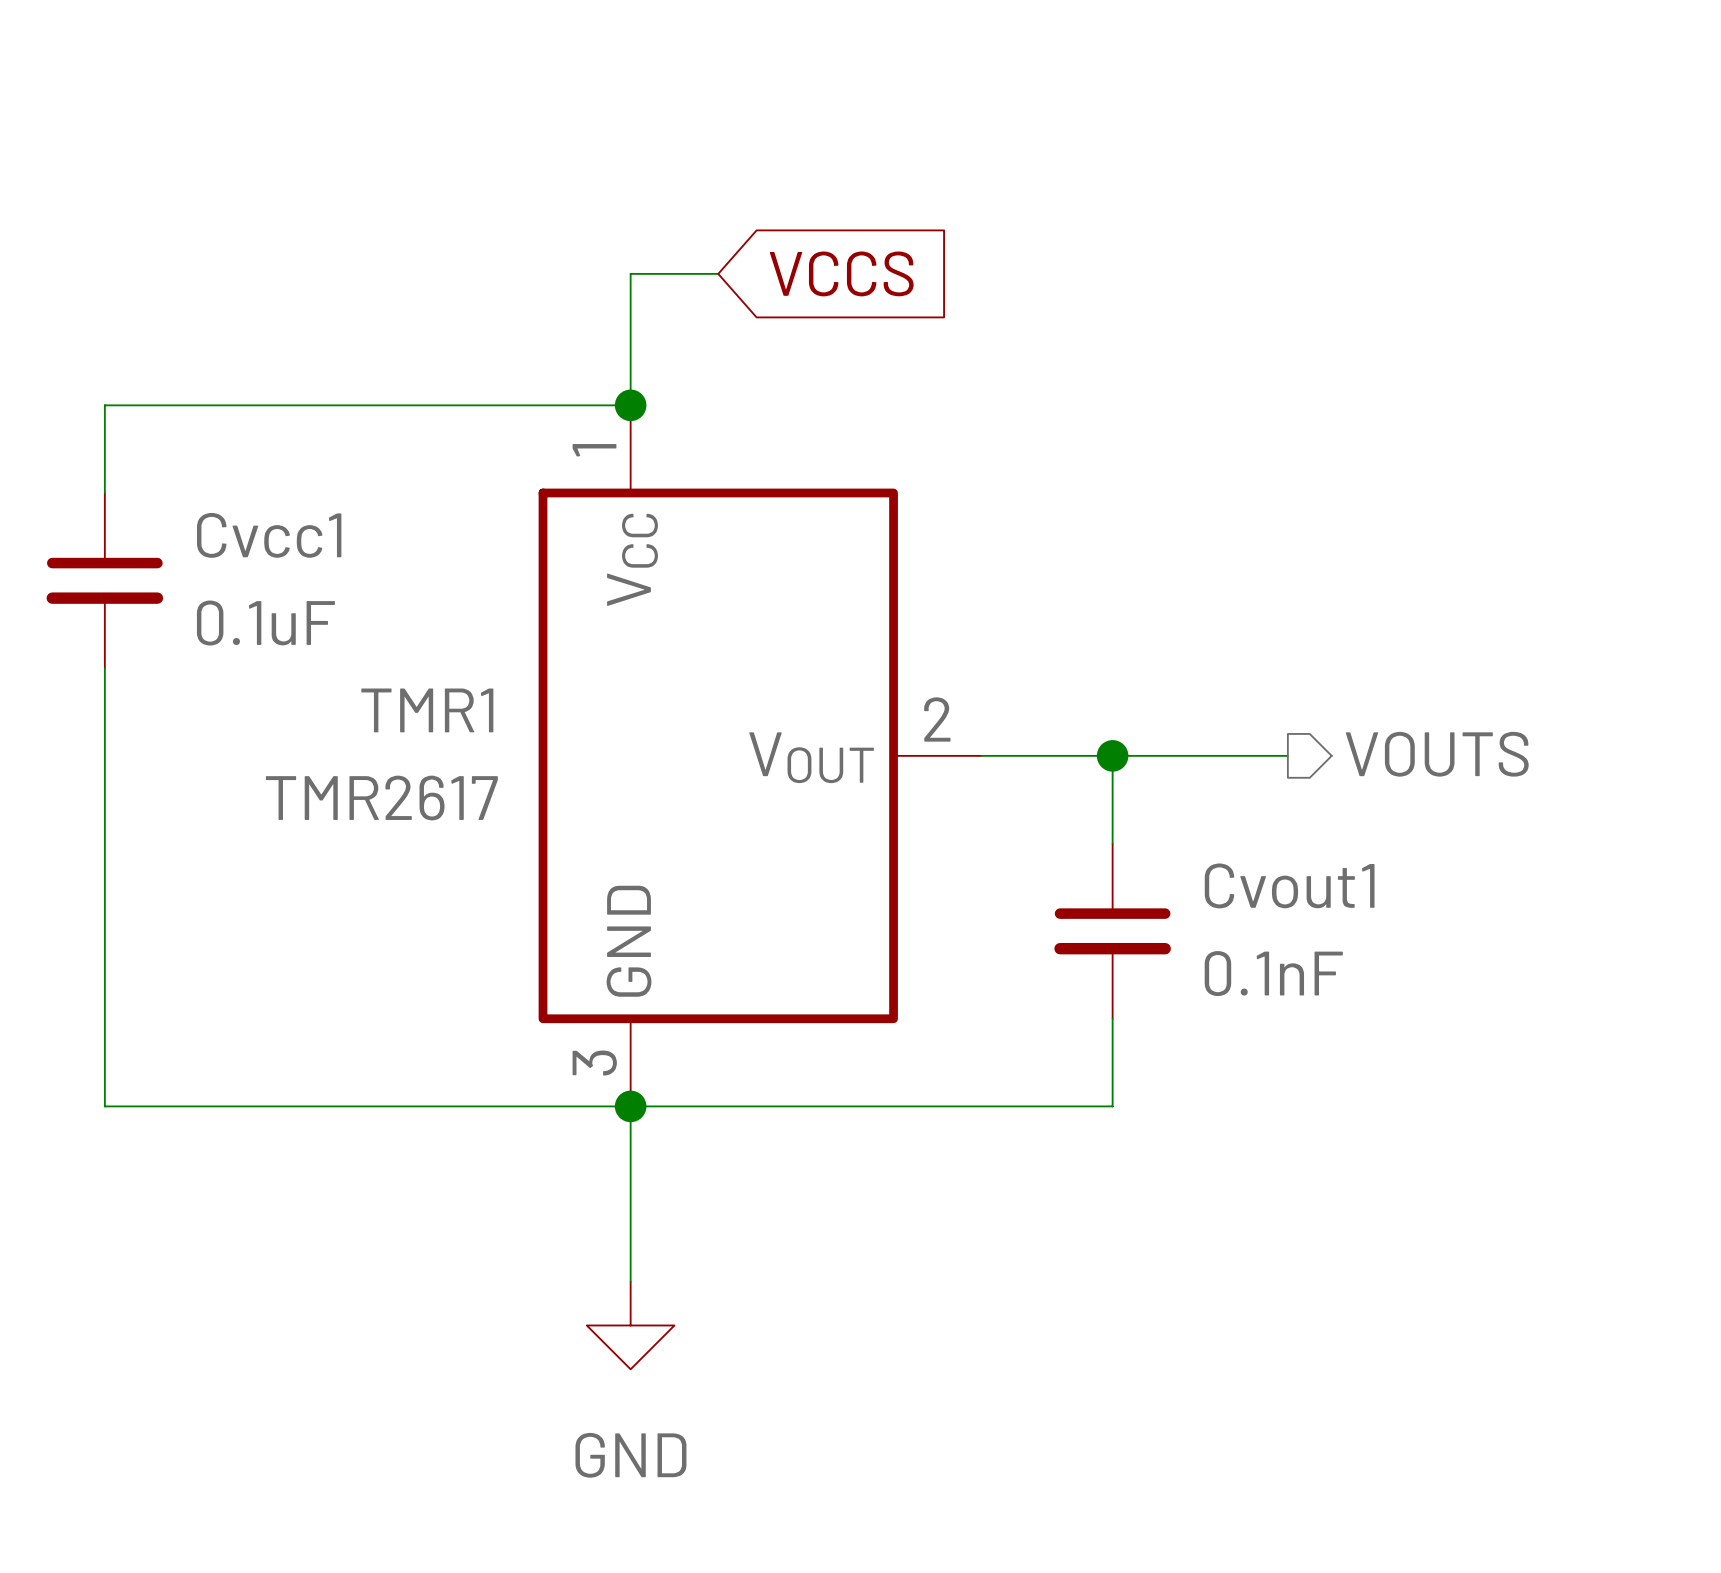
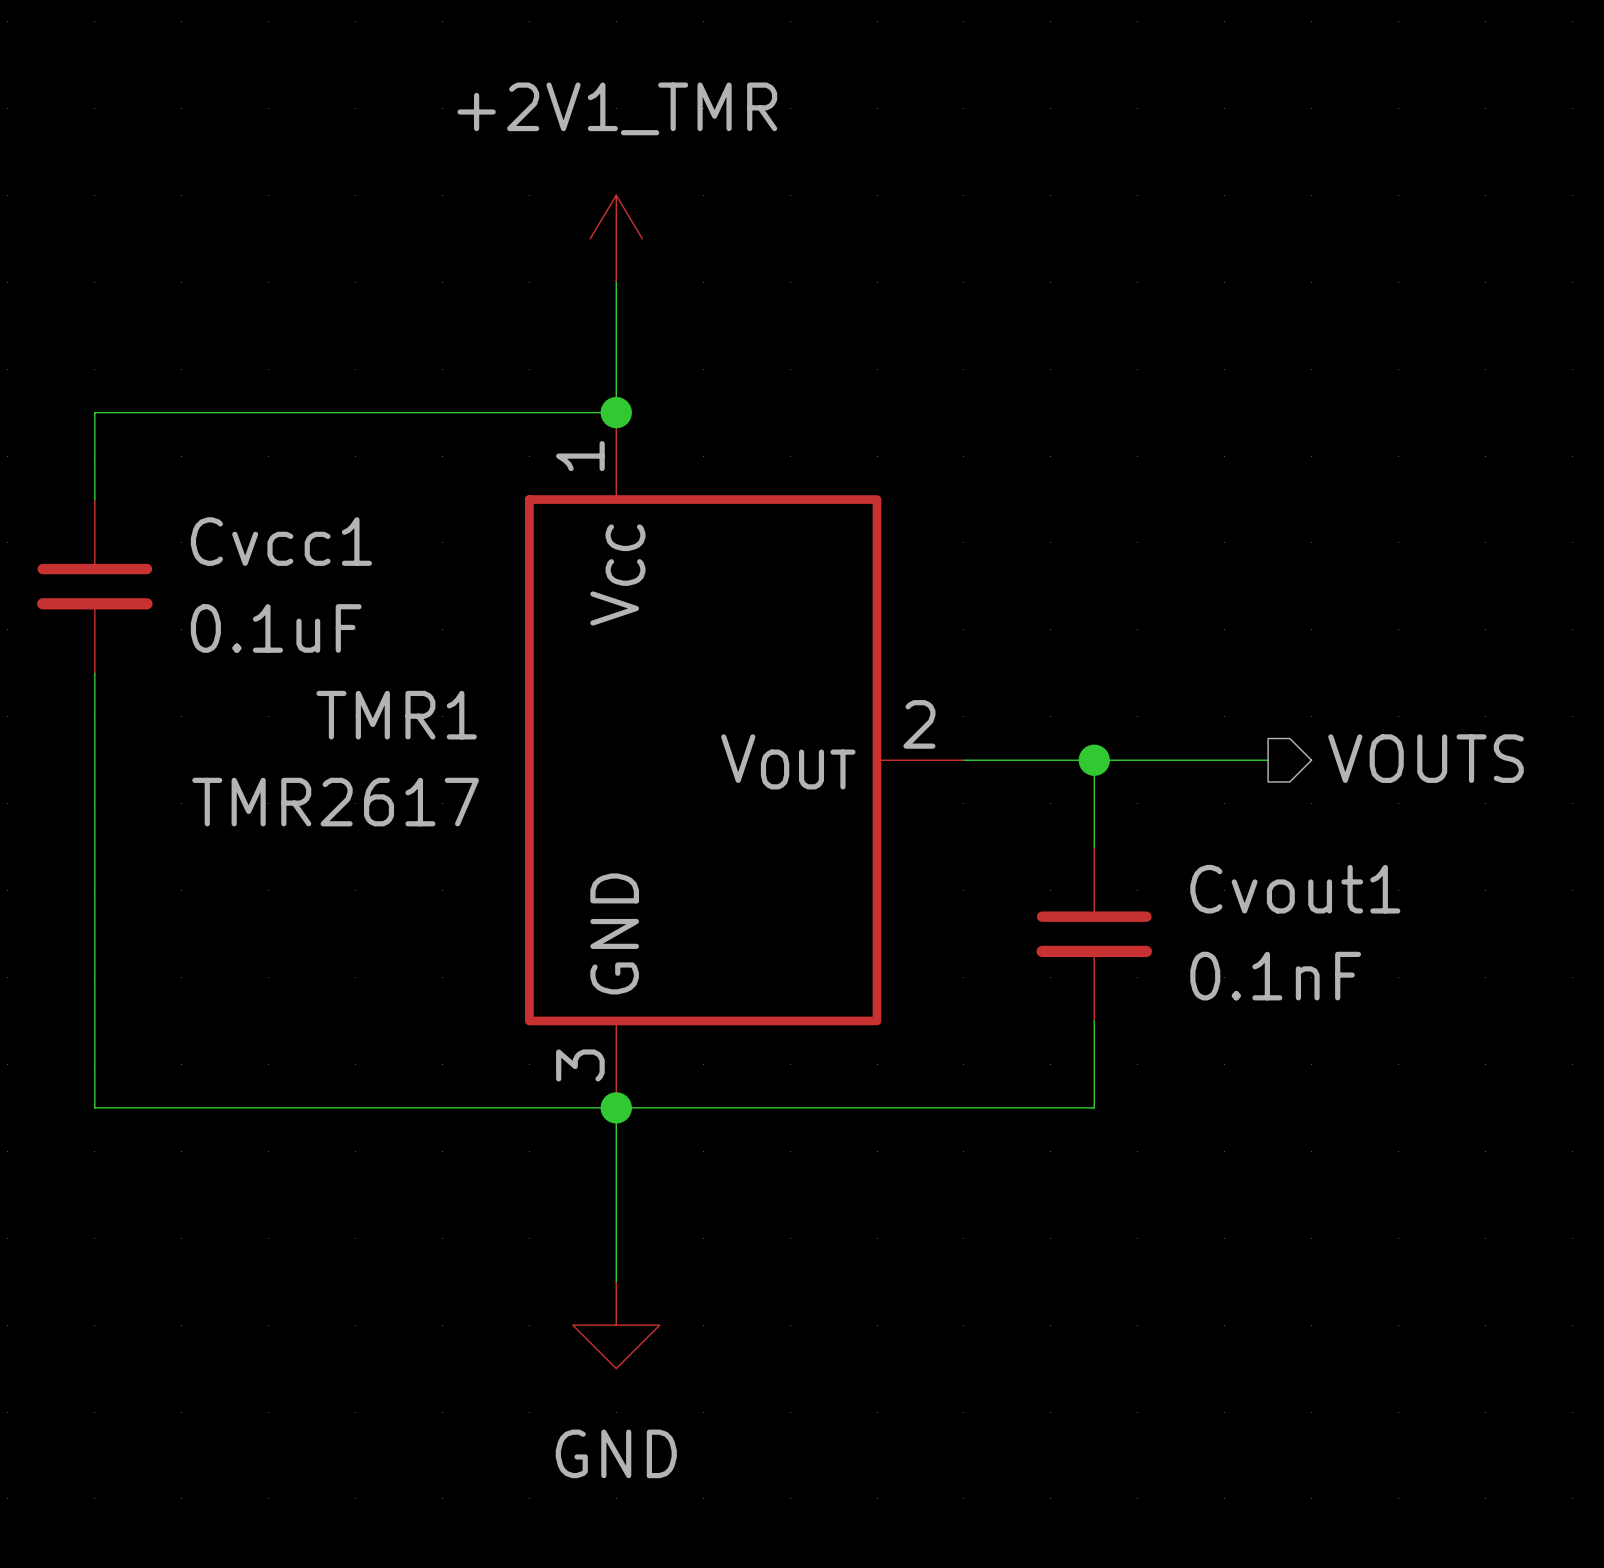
power symbol: none -> +2V1_TMR (616, 238)
wire: (630, 273) (718, 273) -> none
global label: VCCS (841, 273) -> none

